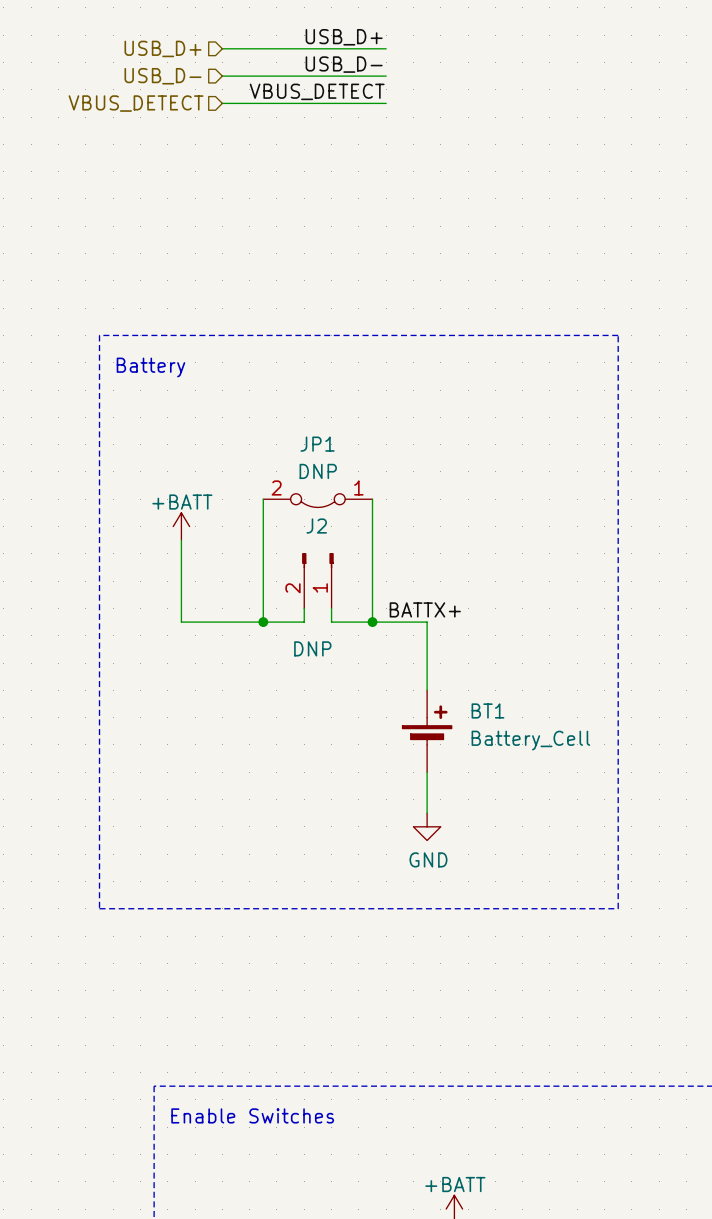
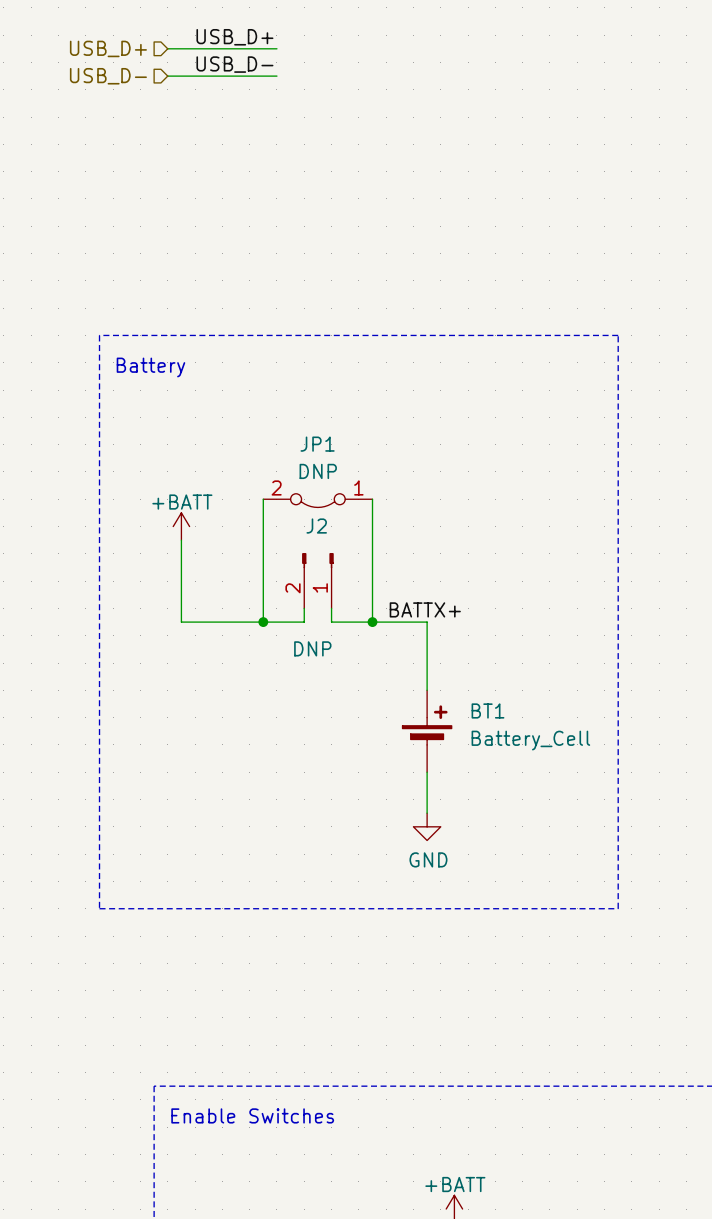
label position: USB_D+ (344, 37) -> USB_D+ (234, 37)
hierarchical label position: USB_D+ (163, 48) -> USB_D+ (108, 48)
wire: none -> (167, 48) (222, 48)
wire: (276, 48) (386, 48) -> none
label position: USB_D- (344, 64) -> USB_D- (234, 64)
hierarchical label position: USB_D- (163, 76) -> USB_D- (108, 76)
wire: none -> (167, 76) (222, 76)
wire: (276, 76) (386, 76) -> none
label: VBUS_DETECT (317, 91) -> none
hierarchical label: VBUS_DETECT (136, 103) -> none
wire: (222, 103) (386, 103) -> none

